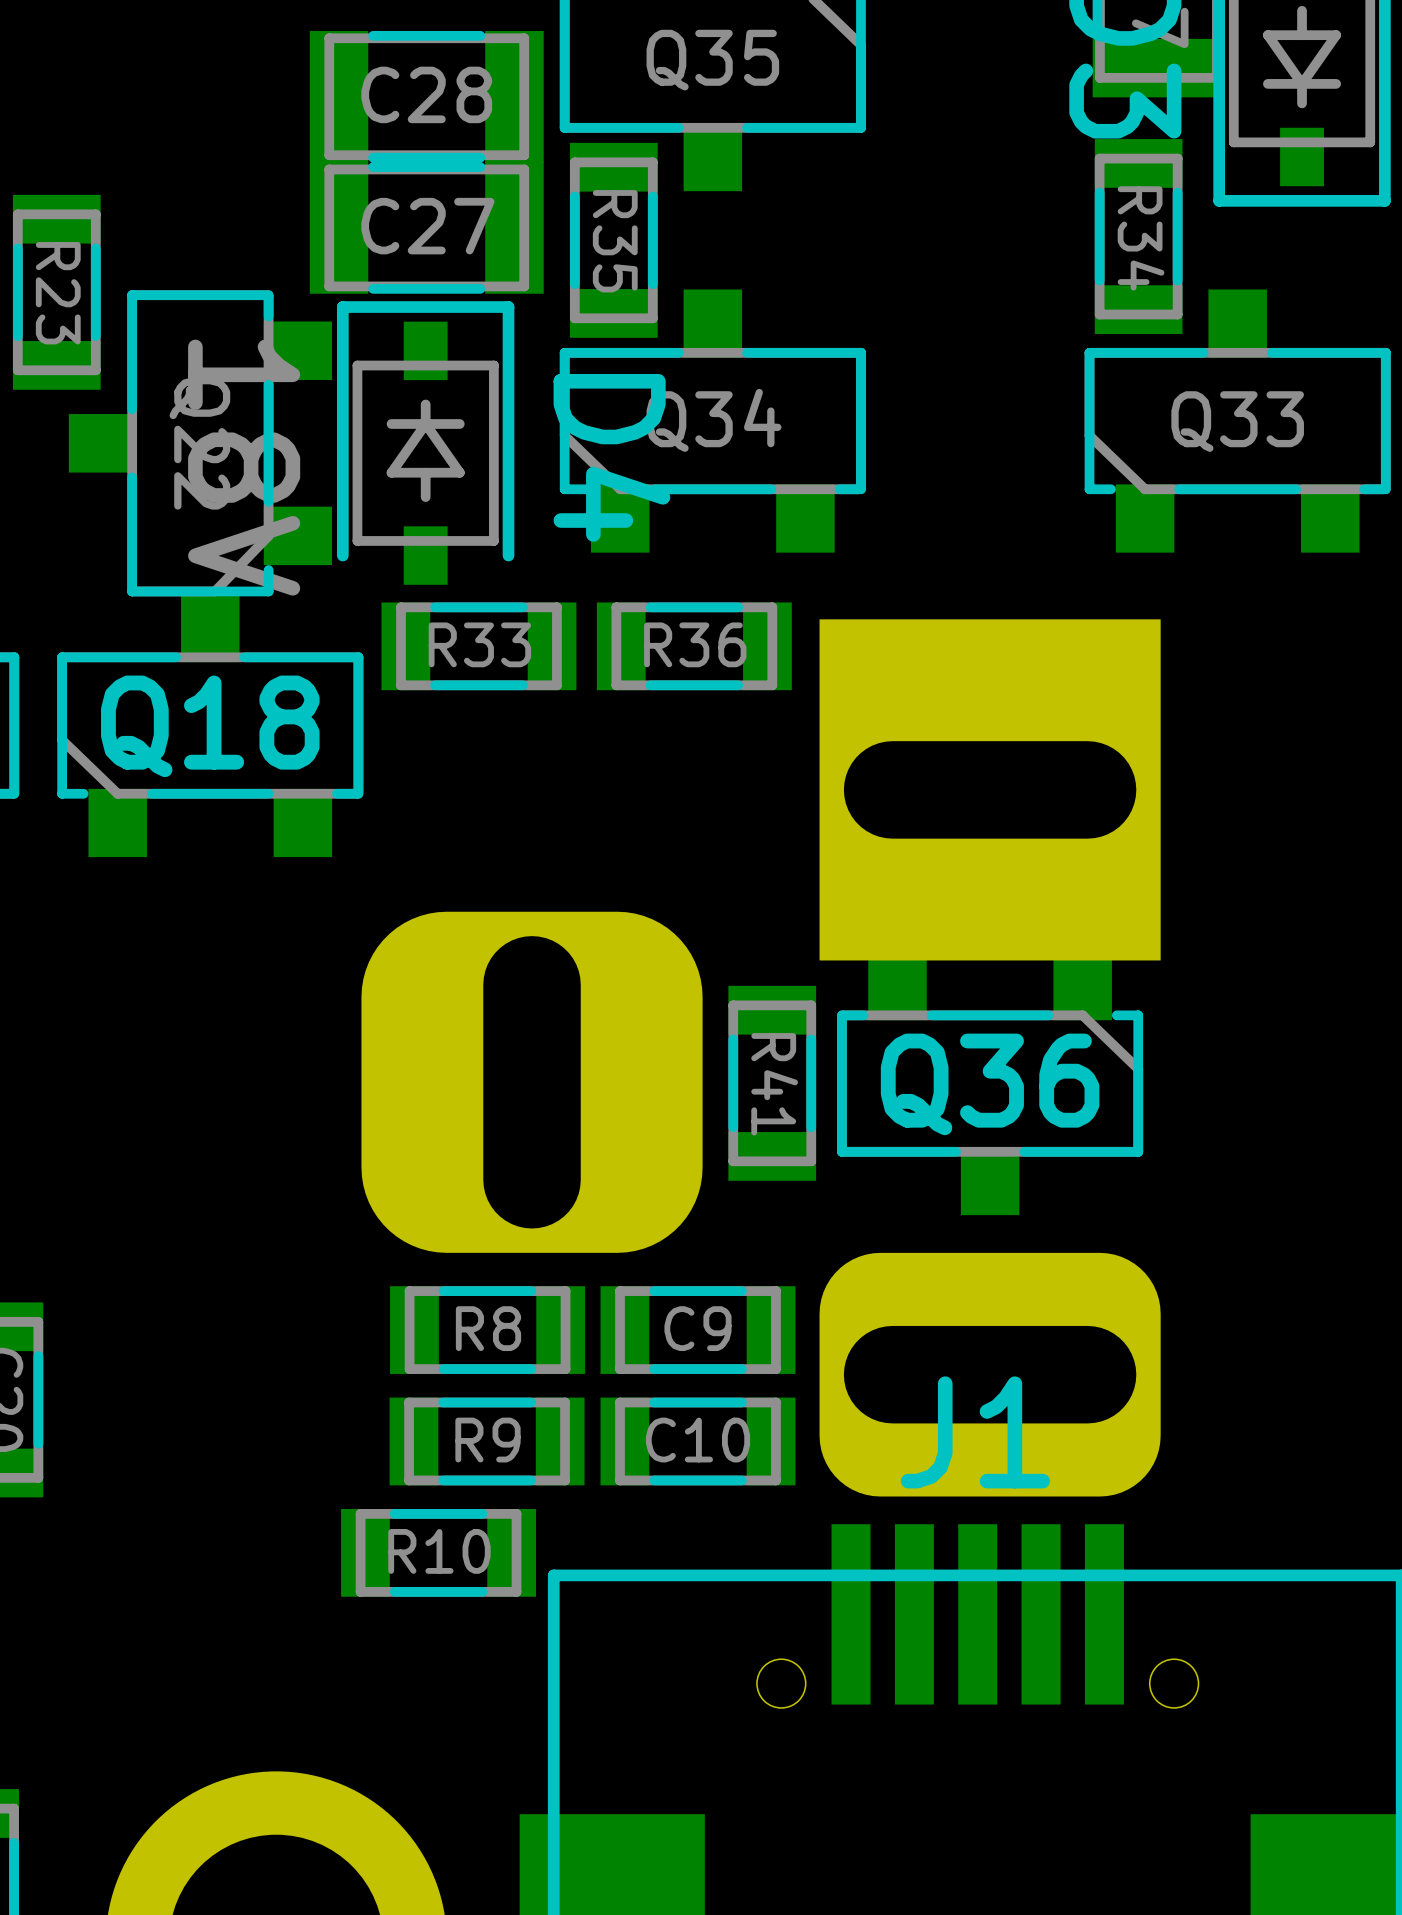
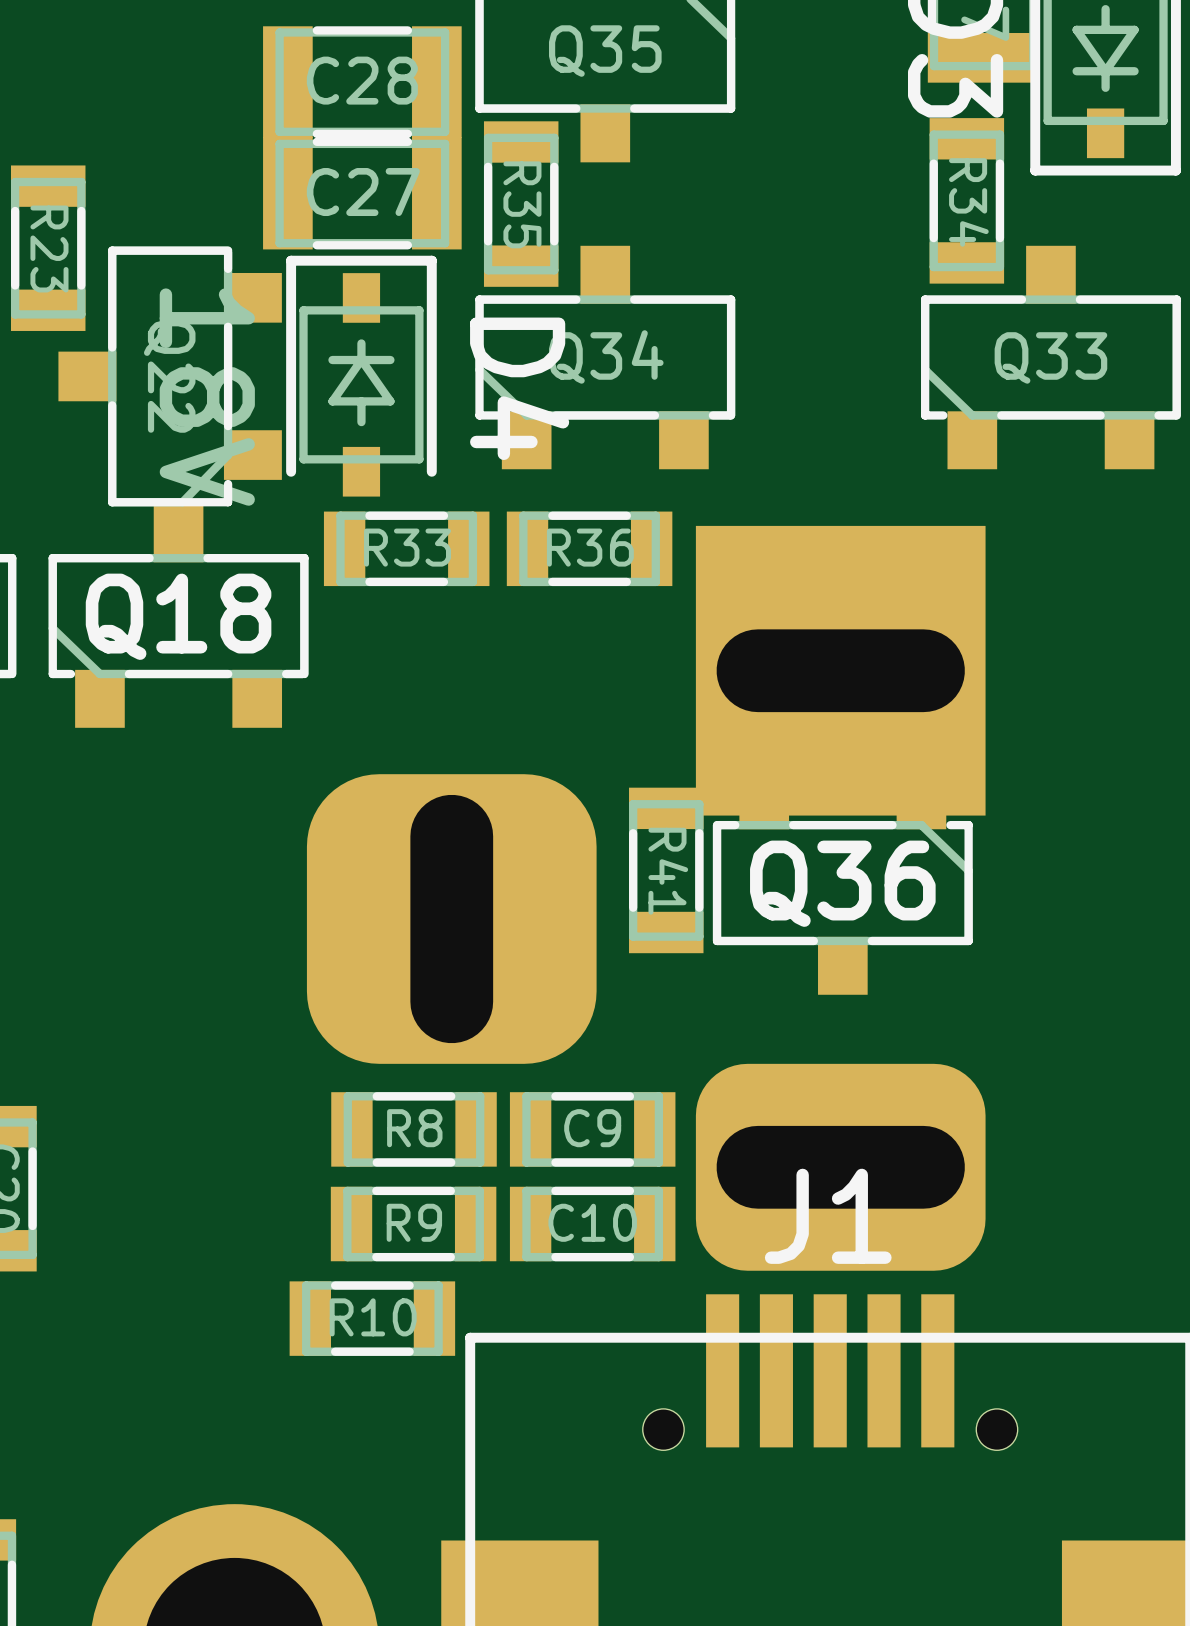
R41 position: (772, 1083) -> (666, 870)
Q36 position: (990, 1083) -> (842, 883)

